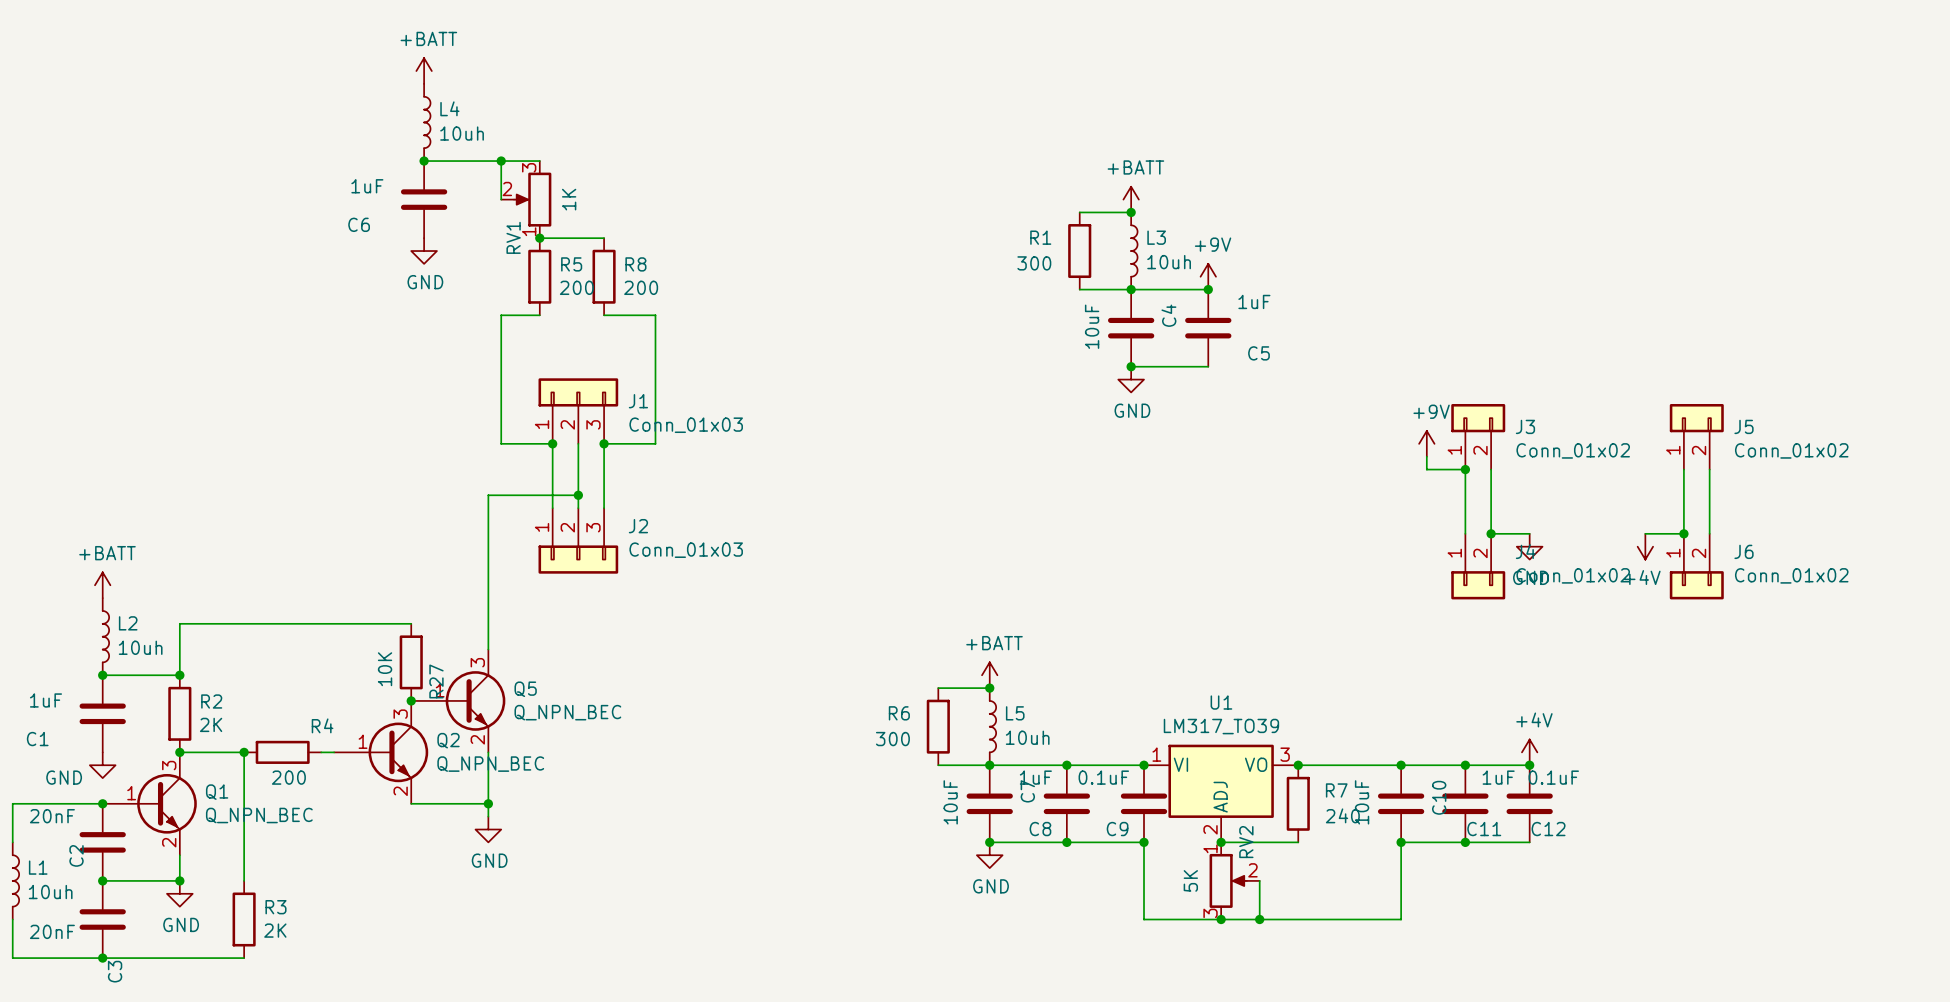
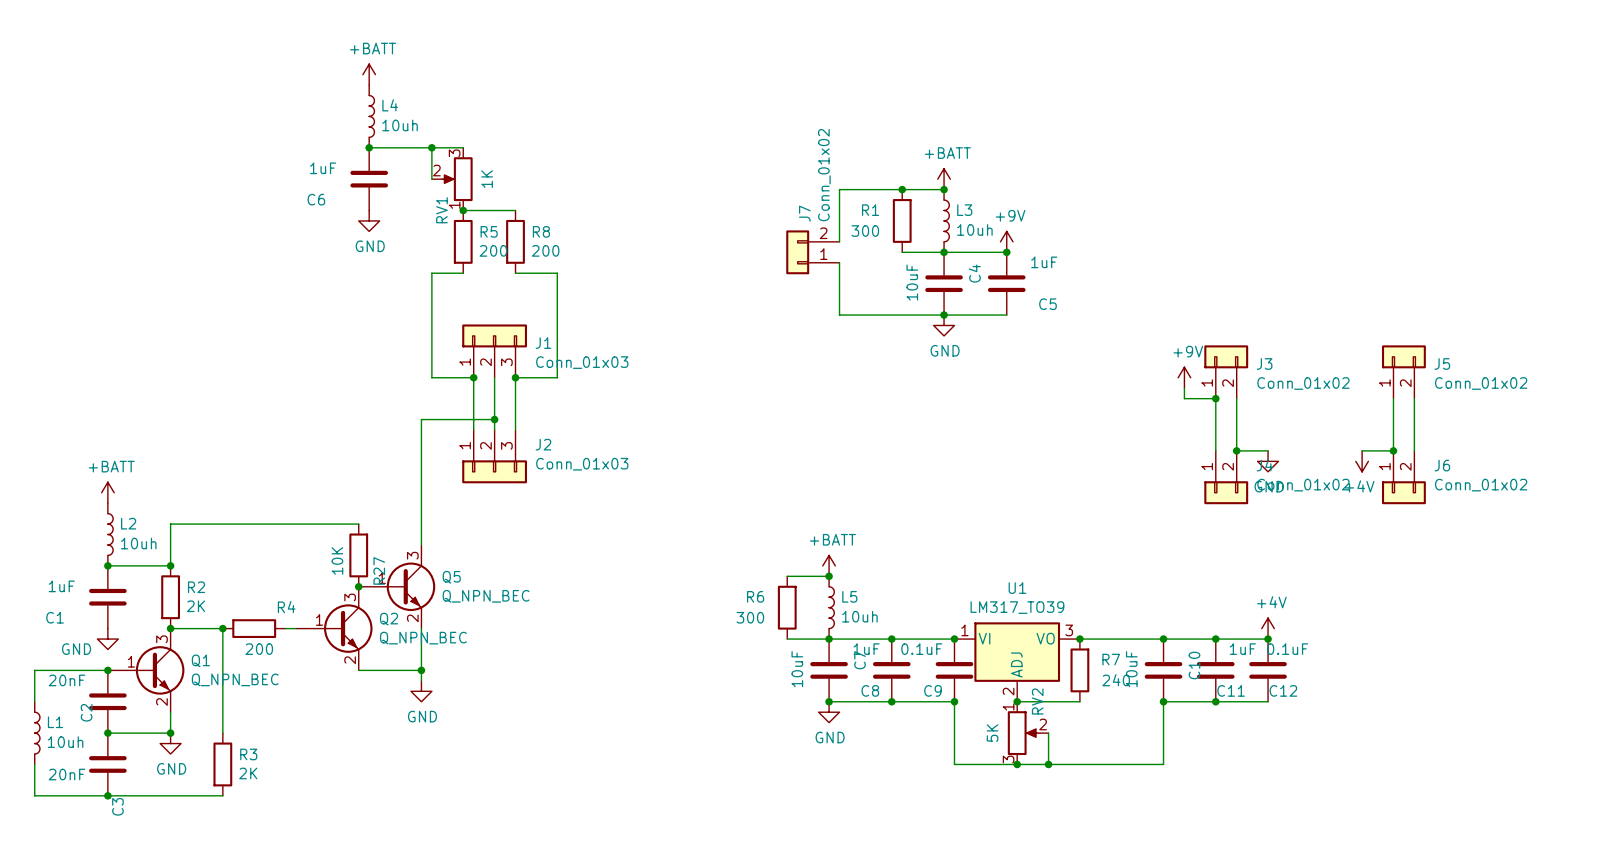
wire: none -> (902, 189) (839, 189) (839, 241)
junction: none -> (902, 189)
J7: none -> Conn_01x02 (812, 252)
wire: none -> (839, 262) (839, 315) (944, 315)

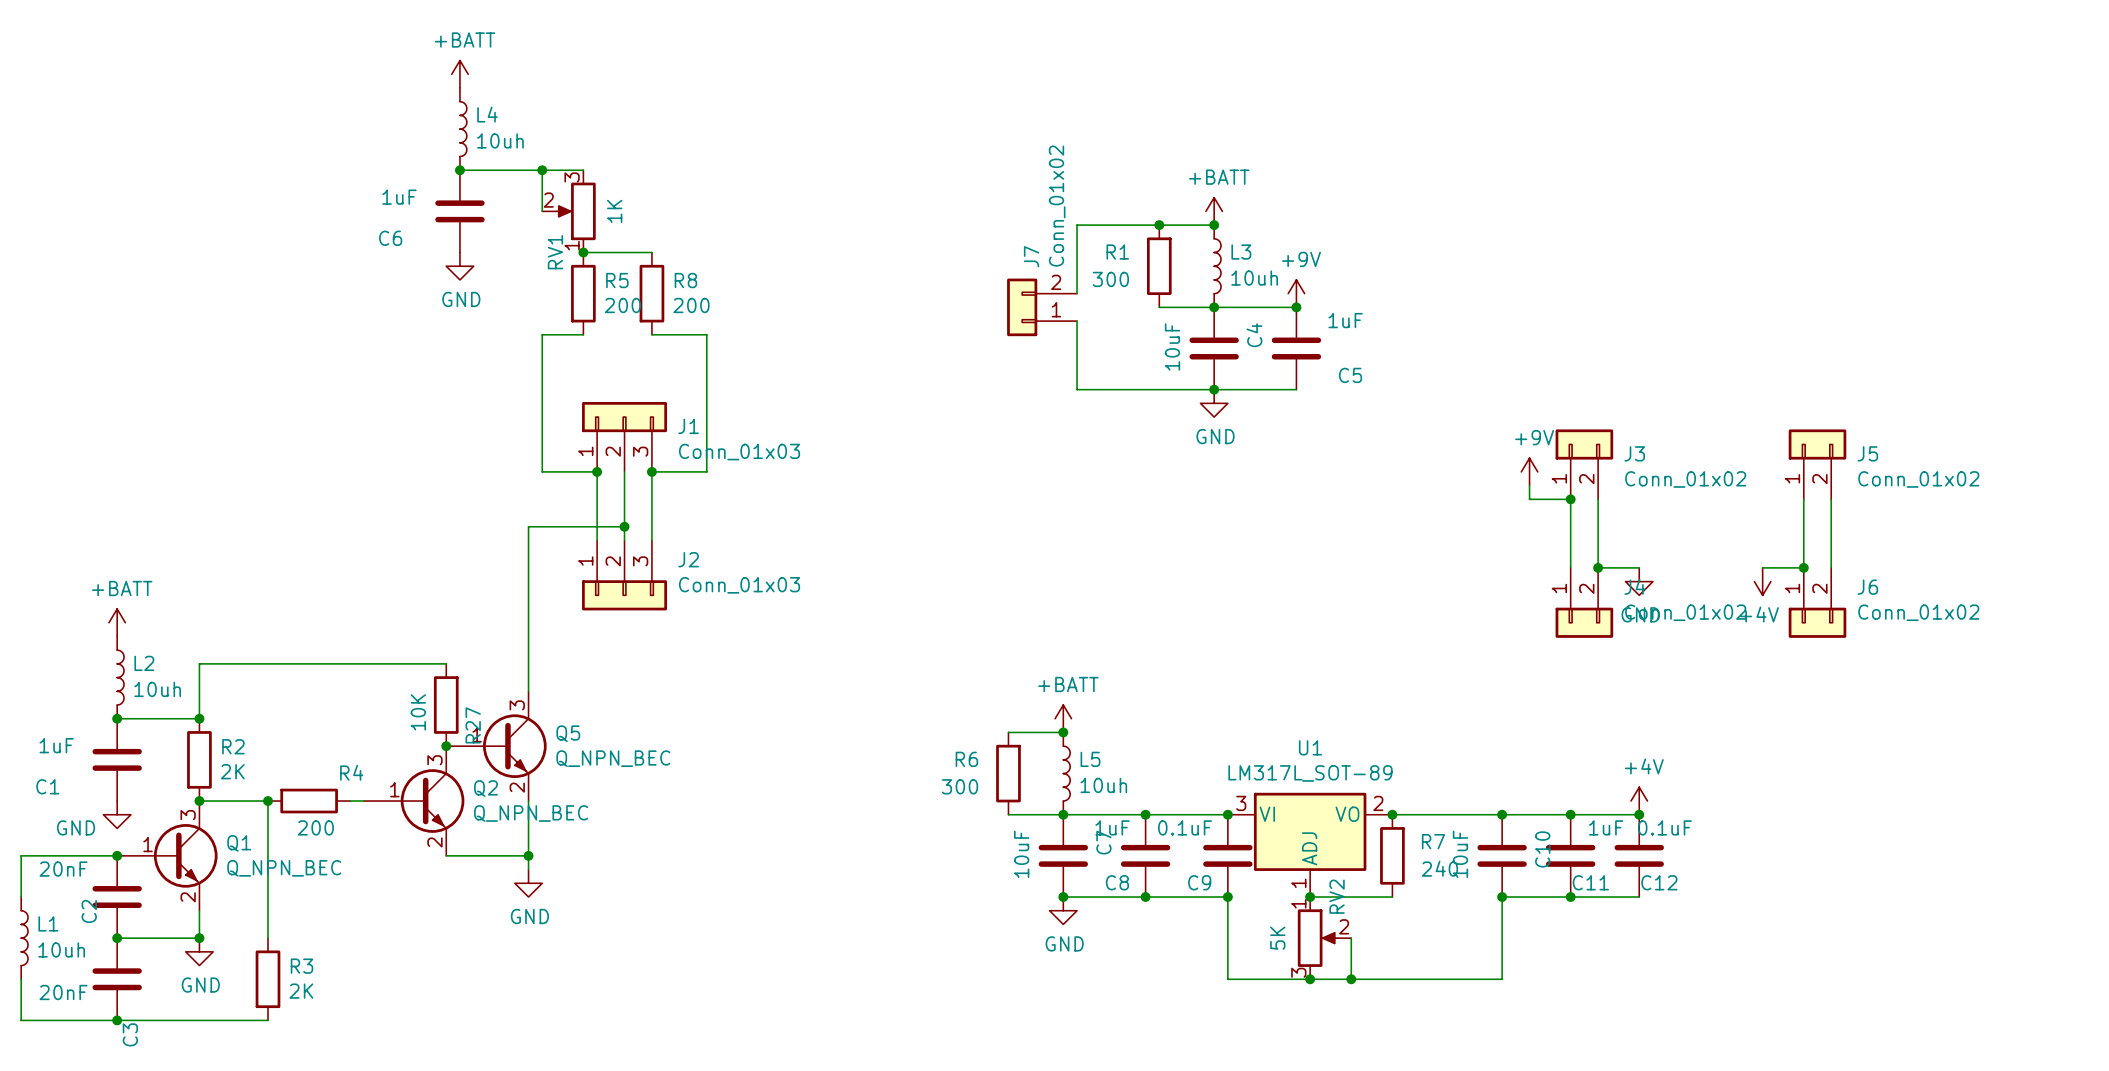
U1 value: LM317_TO39 (1017, 607) -> LM317L_SOT-89 (1310, 773)
U1 pin number: 1 (964, 630) -> 3 (1241, 803)
U1 pin number: 3 (1069, 630) -> 2 (1378, 803)
U1 pin number: 2 (1008, 691) -> 1 (1298, 883)

